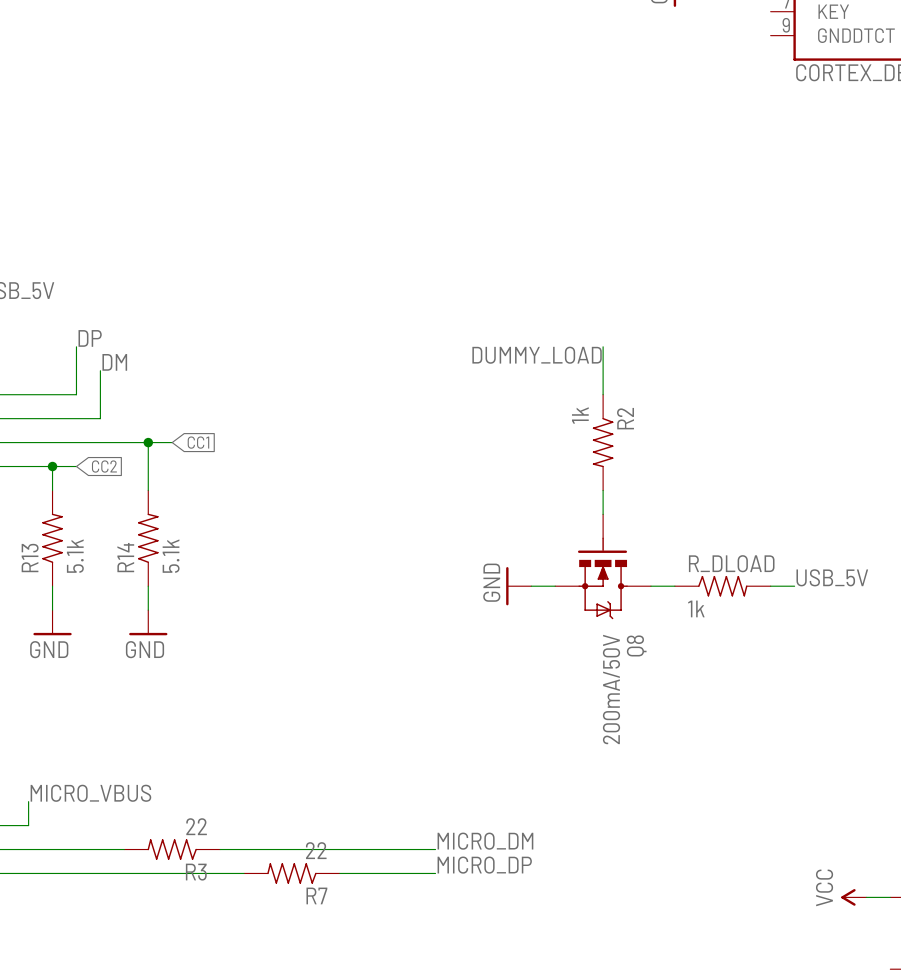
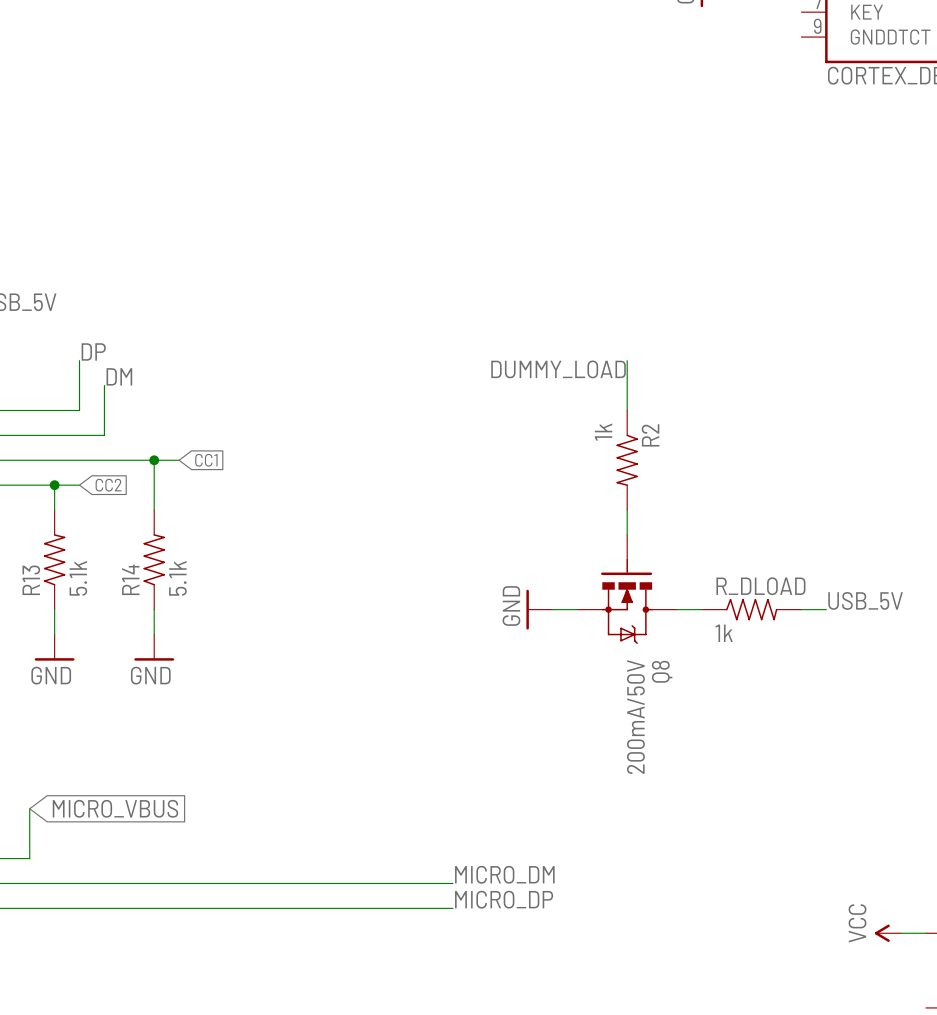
wire: none -> (29, 808) (29, 833)
global label: none -> MICRO_VBUS (115, 808)
label: MICRO_VBUS (90, 793) -> none
R3: 22 (172, 849) -> none
R7: 22 (291, 873) -> none

